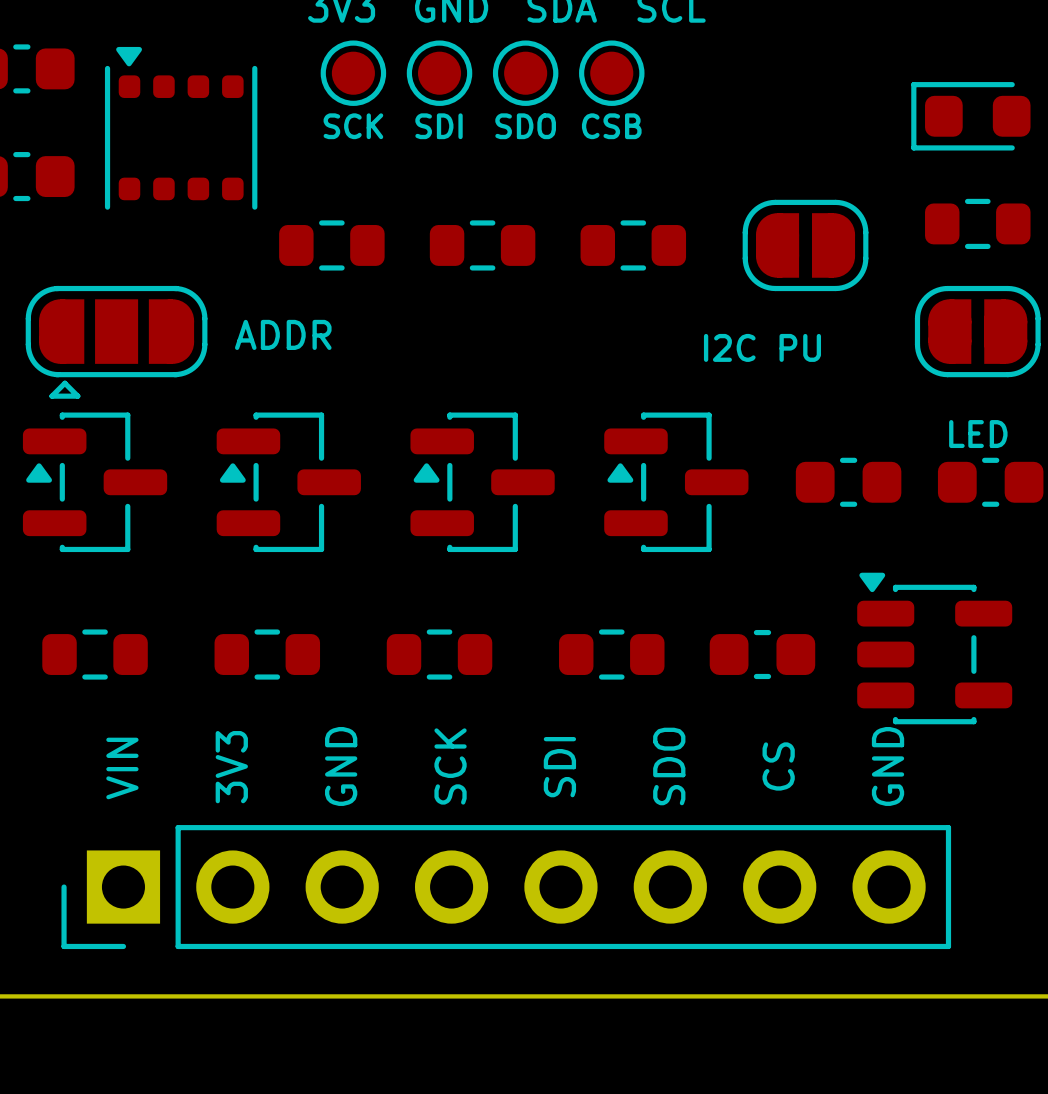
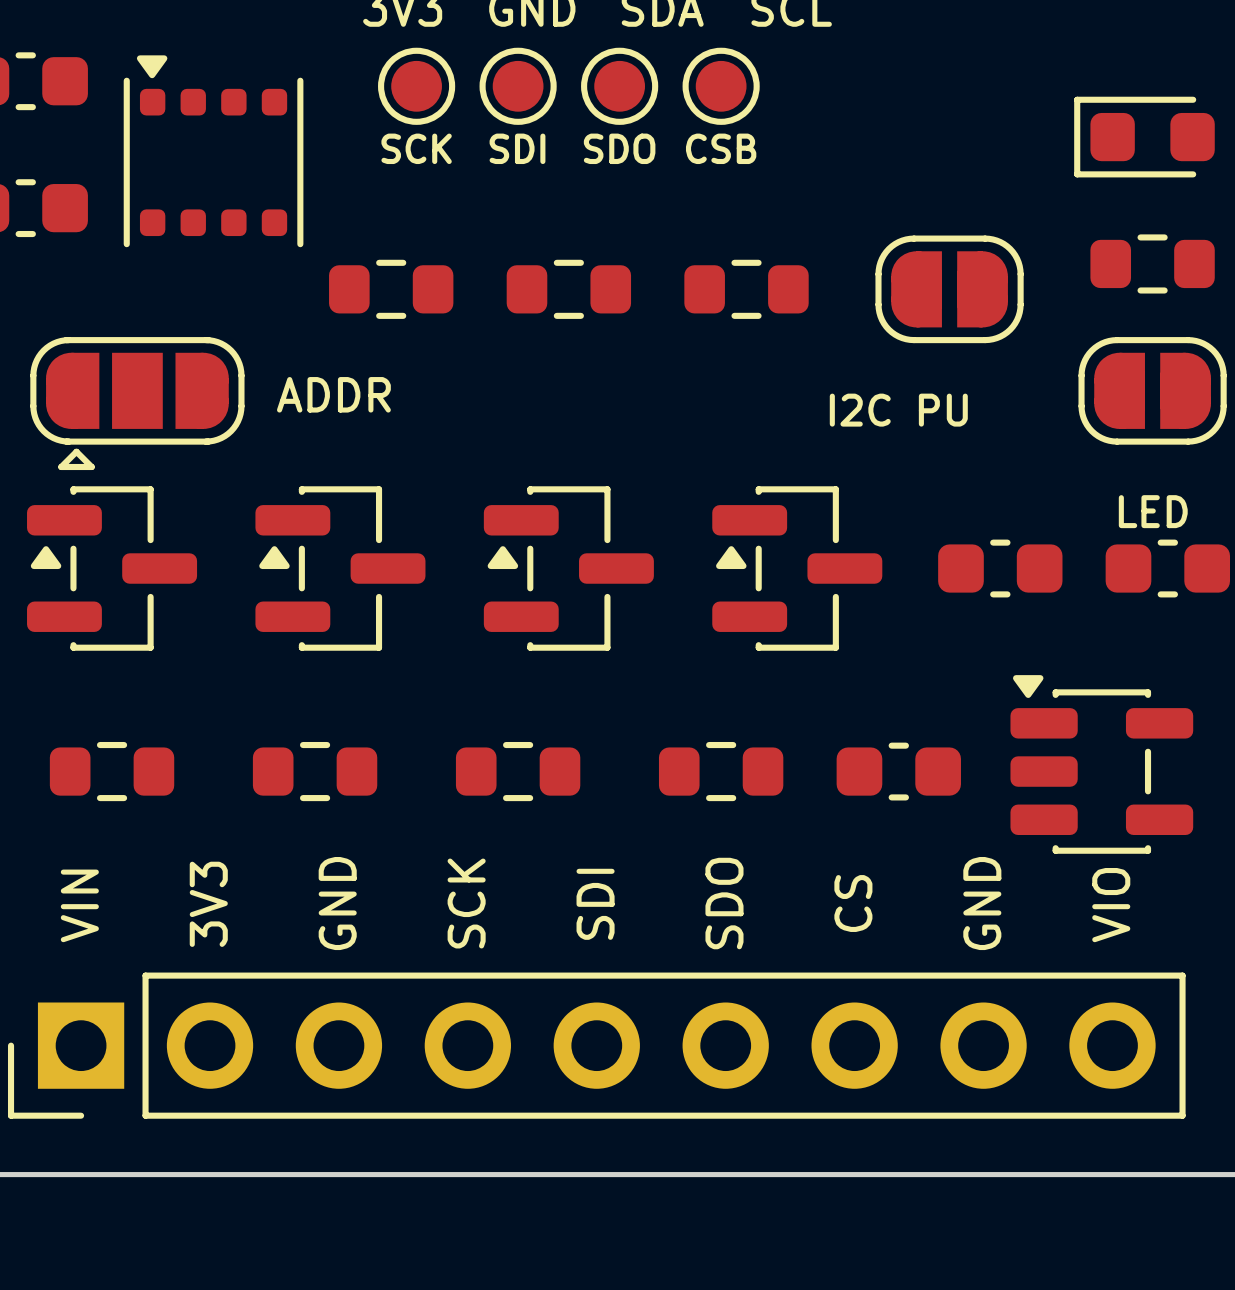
text position: GND (341, 766) -> GND (337, 903)
text position: SCK (450, 766) -> SCK (466, 903)
text position: SDO (669, 766) -> SDO (724, 903)
text position: CS (778, 766) -> CS (853, 903)
text position: GND (888, 766) -> GND (982, 903)
text position: 3V3 (231, 767) -> 3V3 (208, 904)
text position: SDI (559, 767) -> SDI (595, 904)
text: none -> VIO (1111, 905)
text position: VIN (122, 768) -> VIN (79, 905)
part footprint: [61, 825, 952, 950] -> [7, 972, 1186, 1119]

